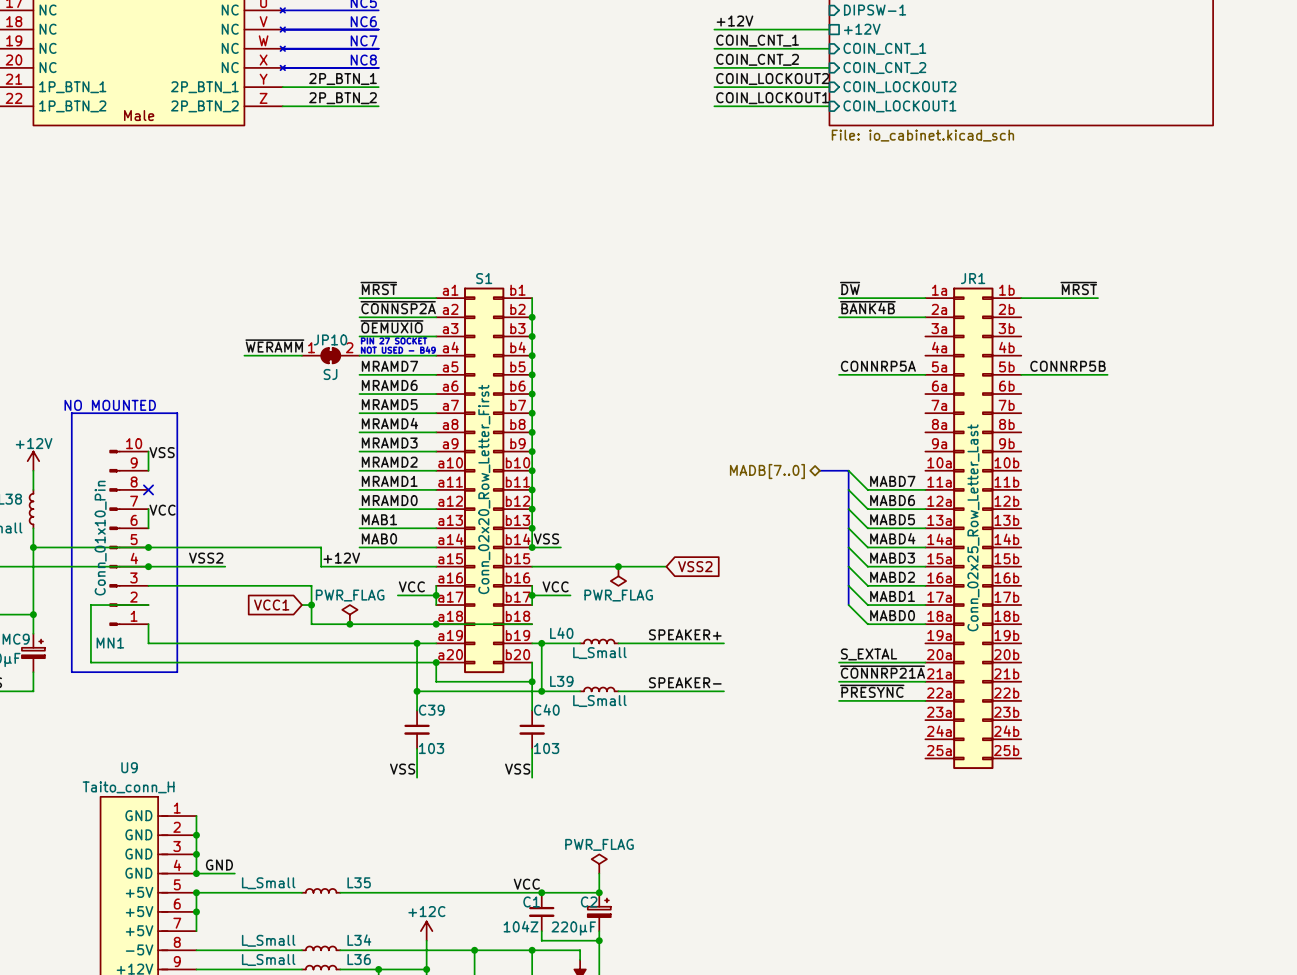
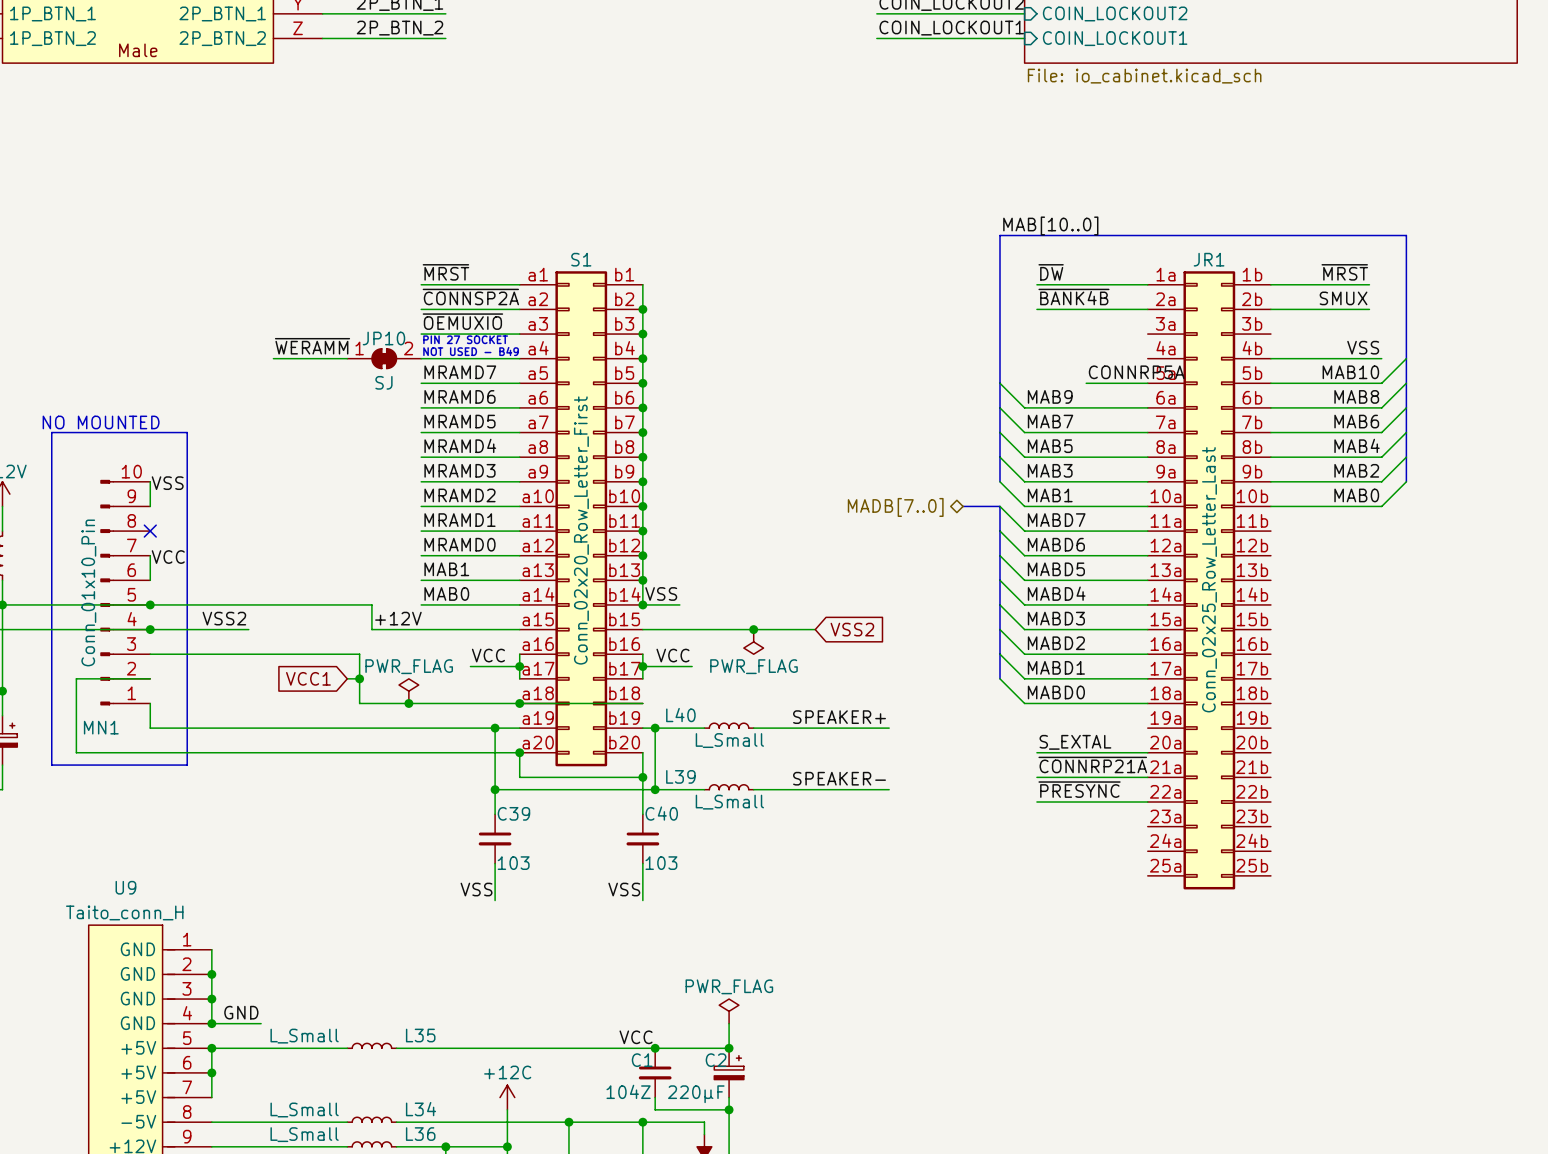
label: none -> MAB[10..0] (1050, 225)
label: none -> SMUX (1343, 298)
wire: none -> (1270, 309) (1369, 309)
label: none -> VSS (1363, 347)
wire: none -> (1270, 358) (1381, 358)
wire: none -> (1406, 358) (1381, 383)
label position: CONNRP5A (878, 366) -> CONNRP5A (1136, 372)
label: CONNRP5B (1068, 366) -> MAB10 (1350, 372)
wire: none -> (999, 383) (1024, 407) (1147, 407)
wire: (839, 374) (877, 374) -> none
wire: none -> (1406, 383) (1381, 407) (1270, 407)
label: none -> MAB9 (1050, 396)
label: none -> MAB8 (1356, 396)
wire: none -> (999, 407) (1024, 432) (1147, 432)
wire: none -> (1406, 407) (1381, 432) (1270, 432)
label: none -> MAB7 (1050, 421)
label: none -> MAB6 (1356, 421)
wire: none -> (999, 432) (1024, 457) (1147, 457)
wire: none -> (1406, 432) (1381, 457) (1270, 457)
label: none -> MAB5 (1050, 446)
label: none -> MAB4 (1357, 445)
wire: none -> (999, 457) (1024, 481) (1147, 481)
wire: none -> (1406, 457) (1381, 481) (1270, 481)
label: none -> MAB3 (1050, 470)
label: none -> MAB2 (1356, 470)
wire: none -> (999, 481) (1024, 506) (1147, 506)
bus: none -> (999, 481) (999, 235) (1406, 235) (1406, 481)
wire: none -> (1406, 481) (1381, 506) (1270, 506)
label: none -> MAB1 (1050, 495)
label: none -> MAB0 (1356, 495)
bus: (819, 470) (848, 470) (848, 605) -> (963, 506) (999, 506) (999, 678)
wire: (848, 470) (867, 489) -> (999, 506) (1024, 531) (1073, 531)
hierarchical label position: MADB[7..0] (767, 471) -> MADB[7..0] (895, 507)
label position: MABD7 (892, 481) -> MABD7 (1056, 520)
wire: (848, 489) (867, 509) -> (999, 531) (1024, 555) (1073, 555)
label position: MABD6 (892, 500) -> MABD6 (1056, 544)
wire: (848, 509) (867, 528) -> (999, 555) (1024, 580) (1073, 580)
label position: MABD5 (892, 519) -> MABD5 (1056, 569)
wire: (848, 528) (867, 547) -> (999, 580) (1024, 604) (1073, 604)
label position: MABD4 (892, 538) -> MABD4 (1056, 593)
wire: (848, 547) (867, 566) -> (999, 604) (1024, 629) (1073, 629)
label position: MABD3 (892, 558) -> MABD3 (1056, 618)
wire: (848, 566) (867, 585) -> (999, 629) (1024, 654) (1073, 654)
label position: MABD2 (892, 577) -> MABD2 (1056, 643)
wire: (848, 585) (867, 605) -> (999, 654) (1024, 678) (1073, 678)
label position: MABD1 (892, 596) -> MABD1 (1056, 667)
wire: (848, 605) (867, 624) -> (999, 678) (1024, 703) (1073, 703)
label position: MABD0 (892, 615) -> MABD0 (1056, 692)

